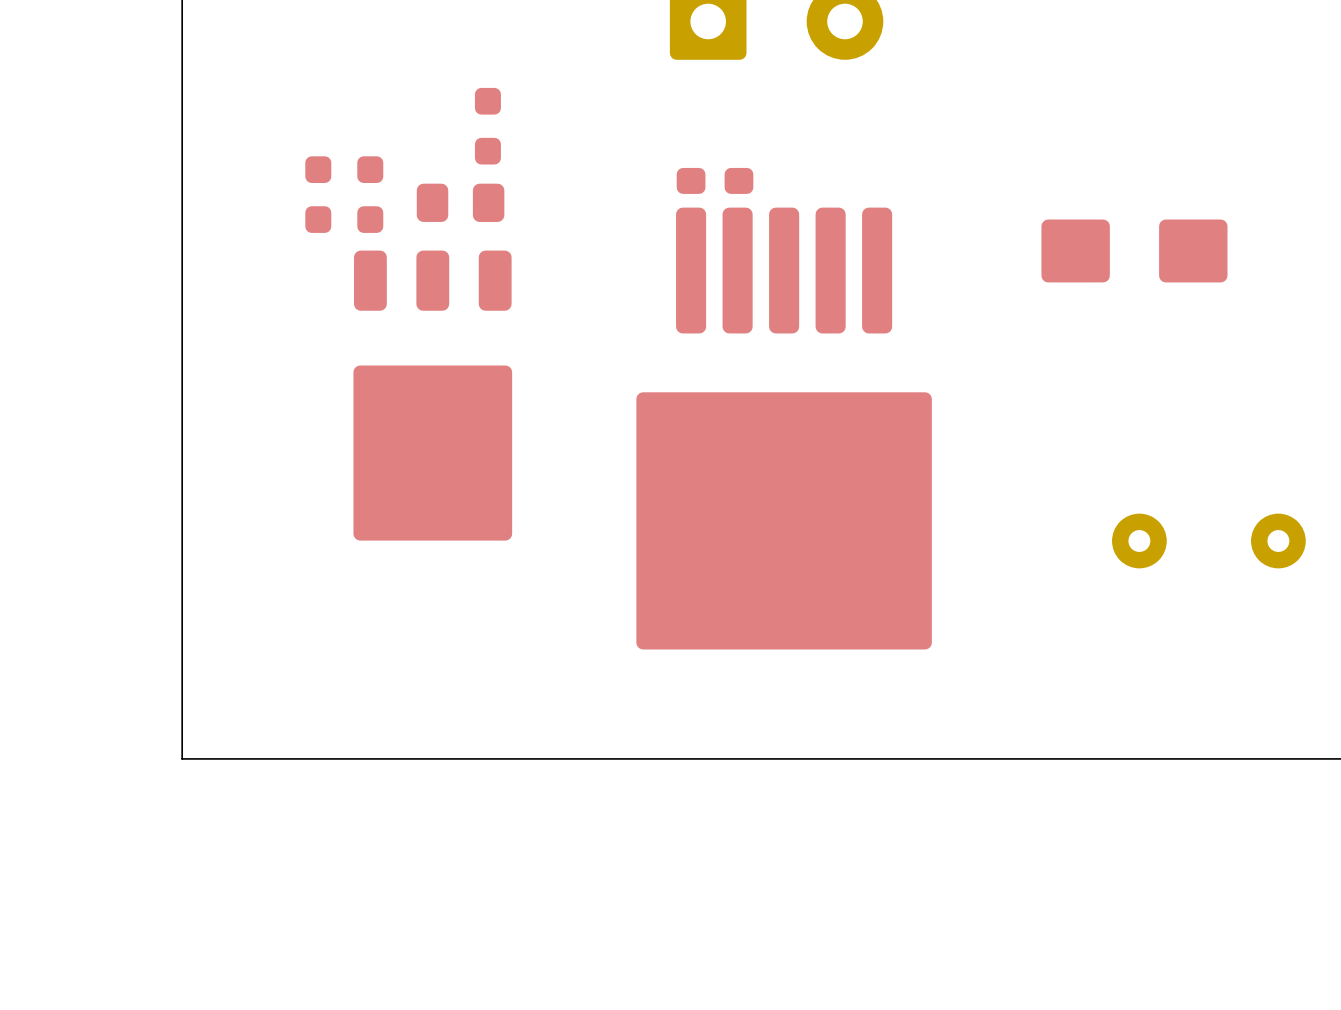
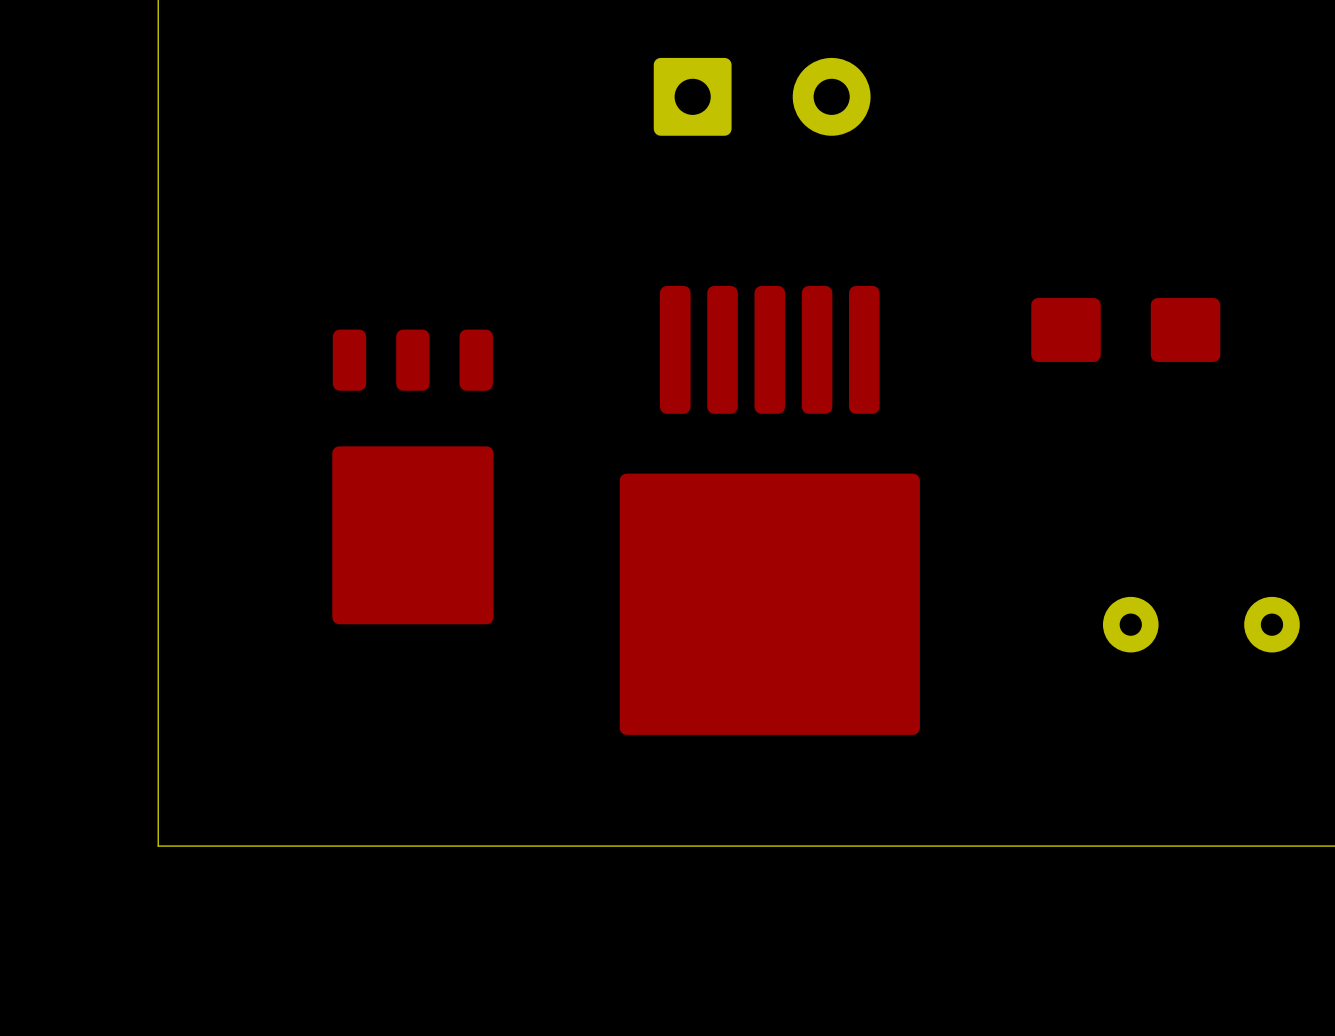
part: (487, 126) -> none
part: (715, 180) -> none
part: (318, 194) -> none
part: (370, 194) -> none
part: (460, 202) -> none

